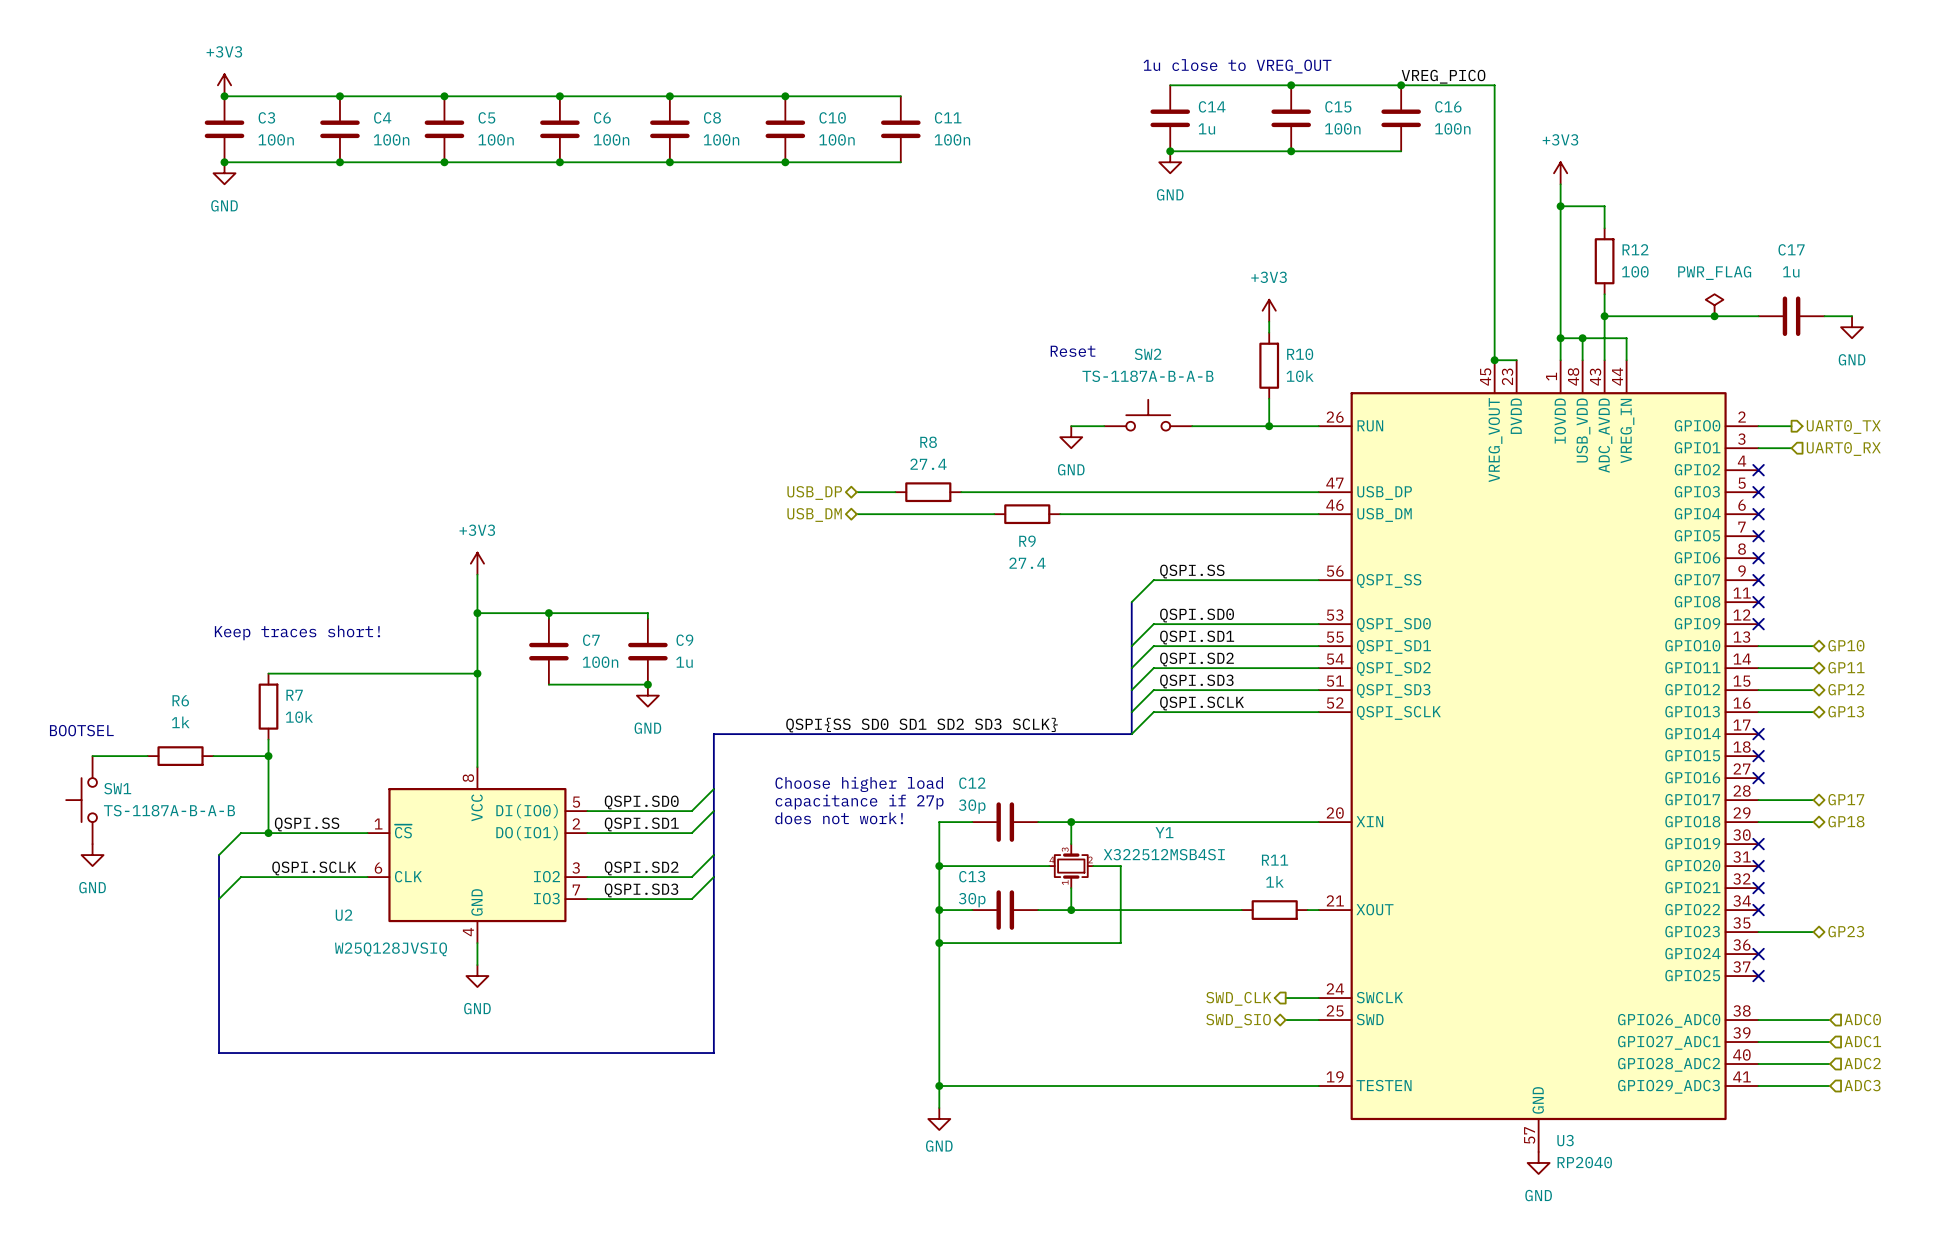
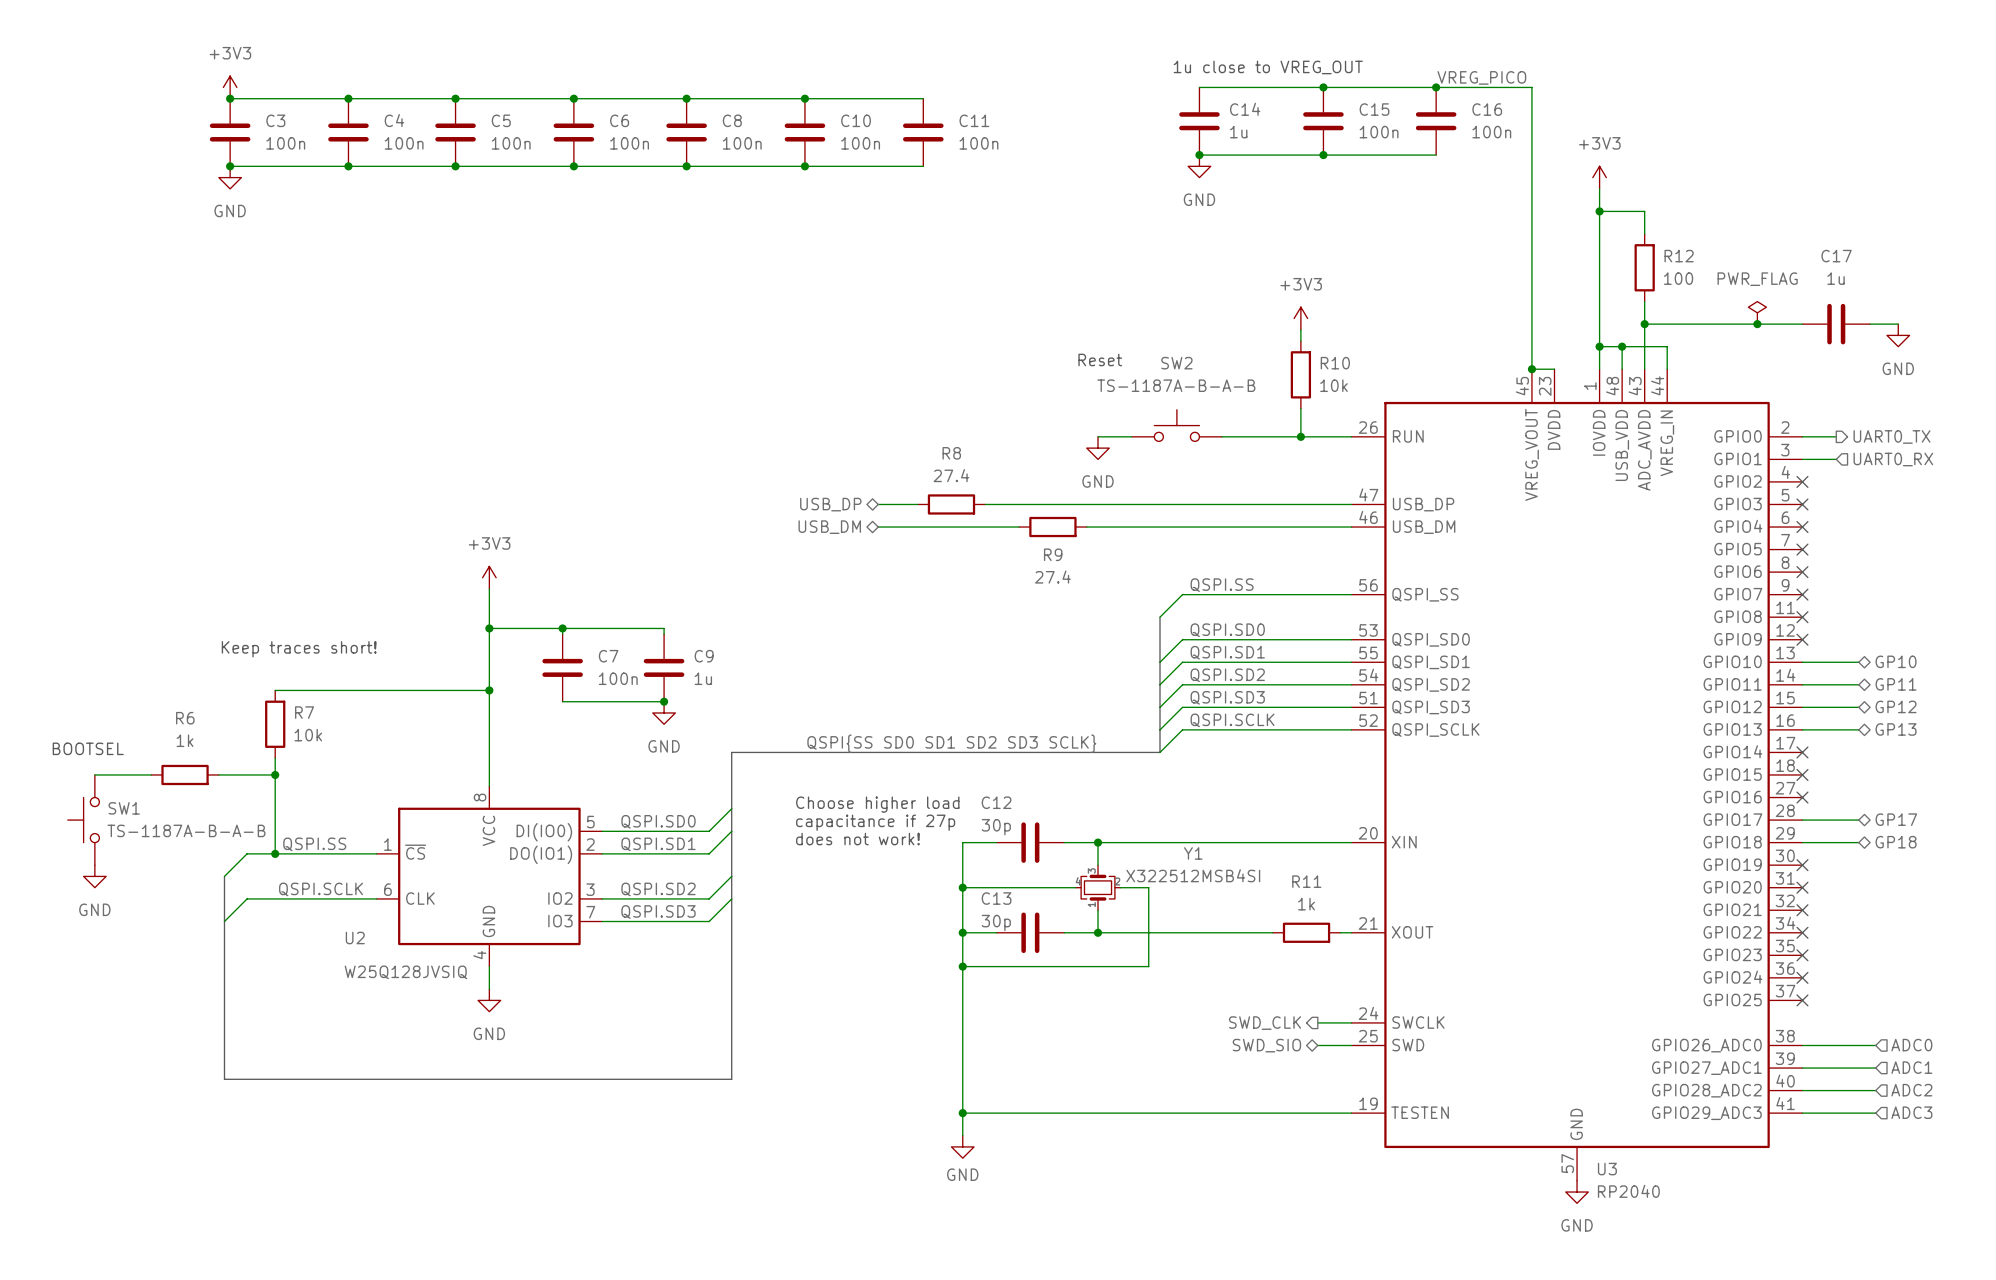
hierarchical label: GP23 (1846, 931) -> none
wire: (1758, 932) (1813, 932) -> none
no-connect mark: none -> (1802, 955)

